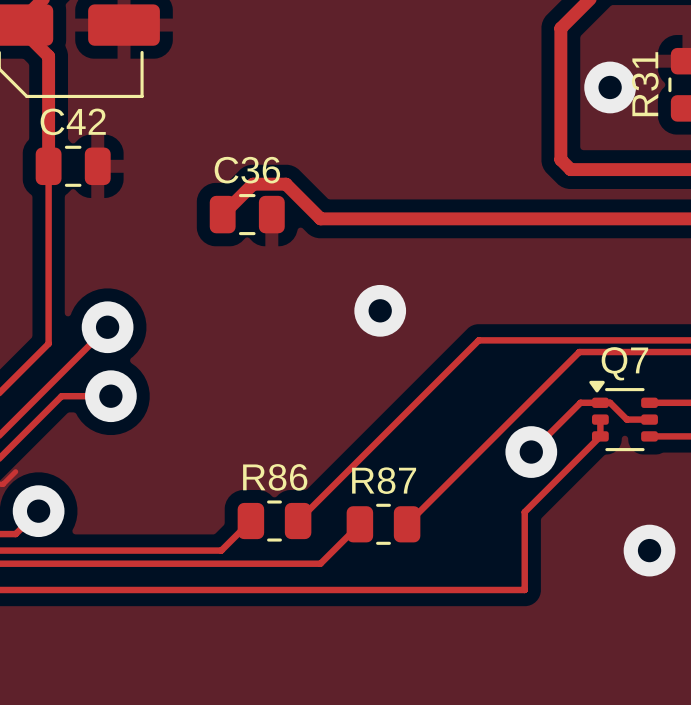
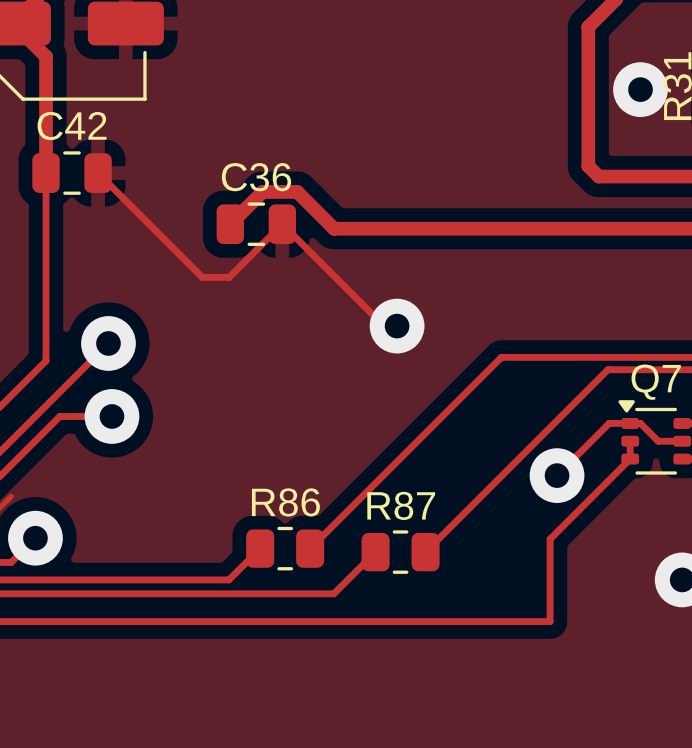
track: none -> (98, 173) (202, 277) (229, 277) (282, 224) (384, 326) (397, 326)

